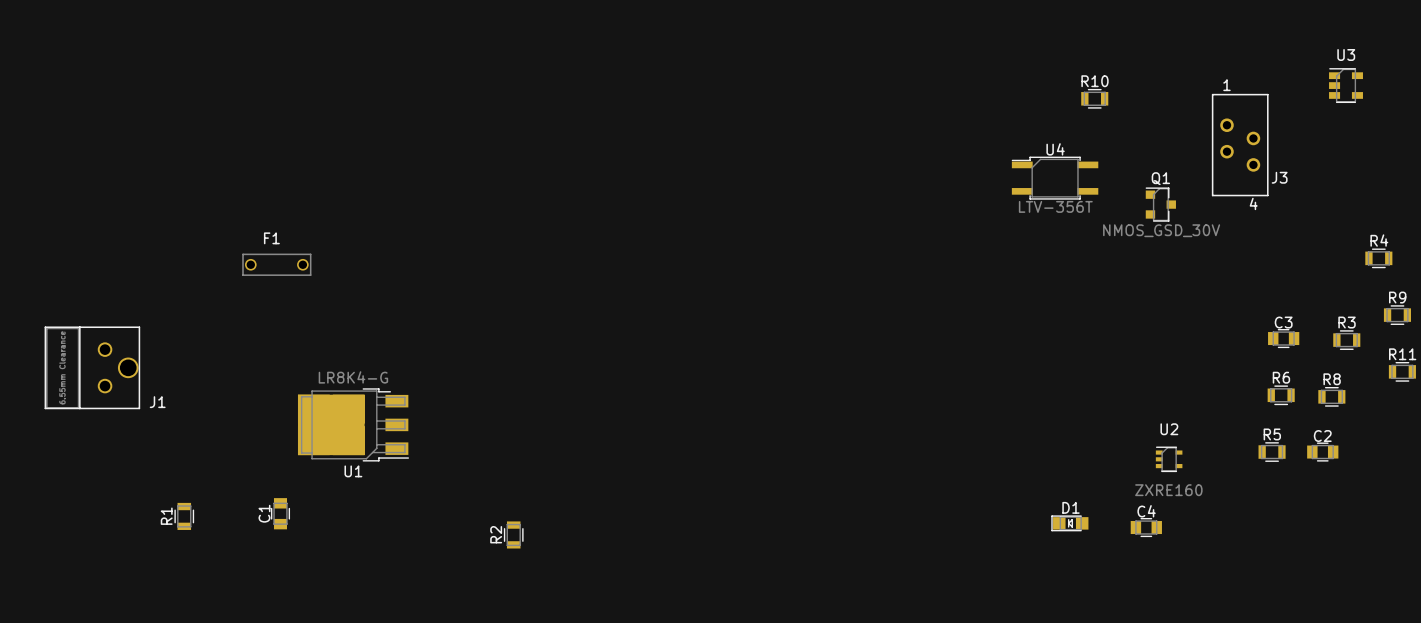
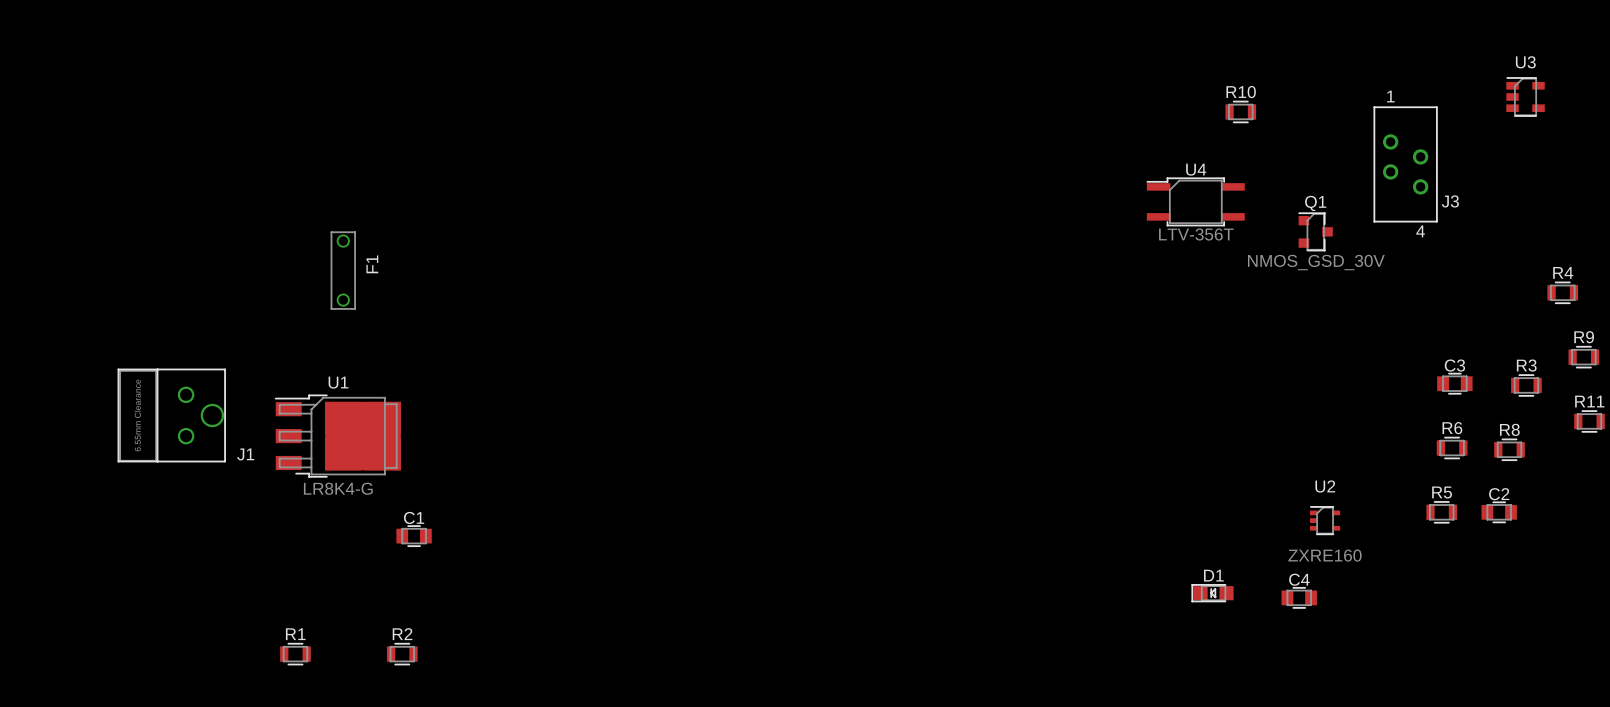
F1 rotation: 0° (276, 264) -> 90° clockwise (343, 270)
J1 position: (92, 367) -> (171, 415)
U1 rotation: 0° (353, 424) -> 180° (337, 436)
U1 position: (353, 424) -> (337, 436)
C1 rotation: 0° (280, 513) -> 90° clockwise (414, 536)
C1 position: (280, 513) -> (414, 536)
R1 rotation: 0° (184, 516) -> 90° clockwise (295, 654)
R1 position: (184, 516) -> (295, 654)
R2 rotation: 0° (513, 534) -> 90° clockwise (402, 654)
R2 position: (513, 534) -> (402, 654)

